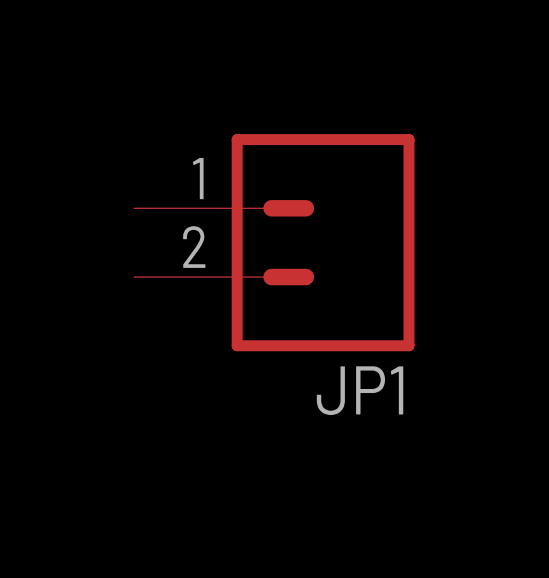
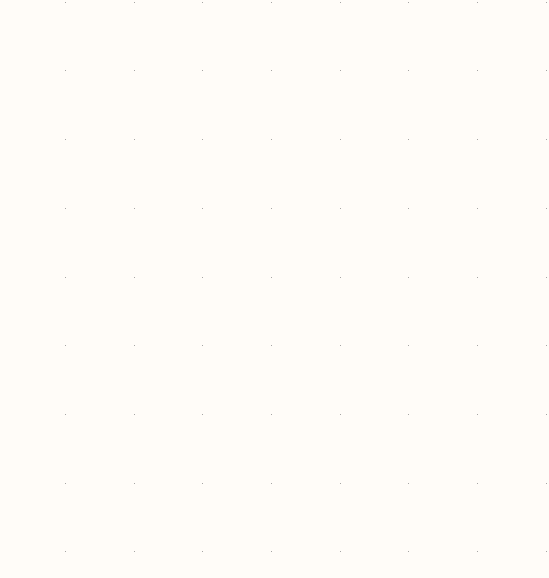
JP1: (274, 242) -> none

